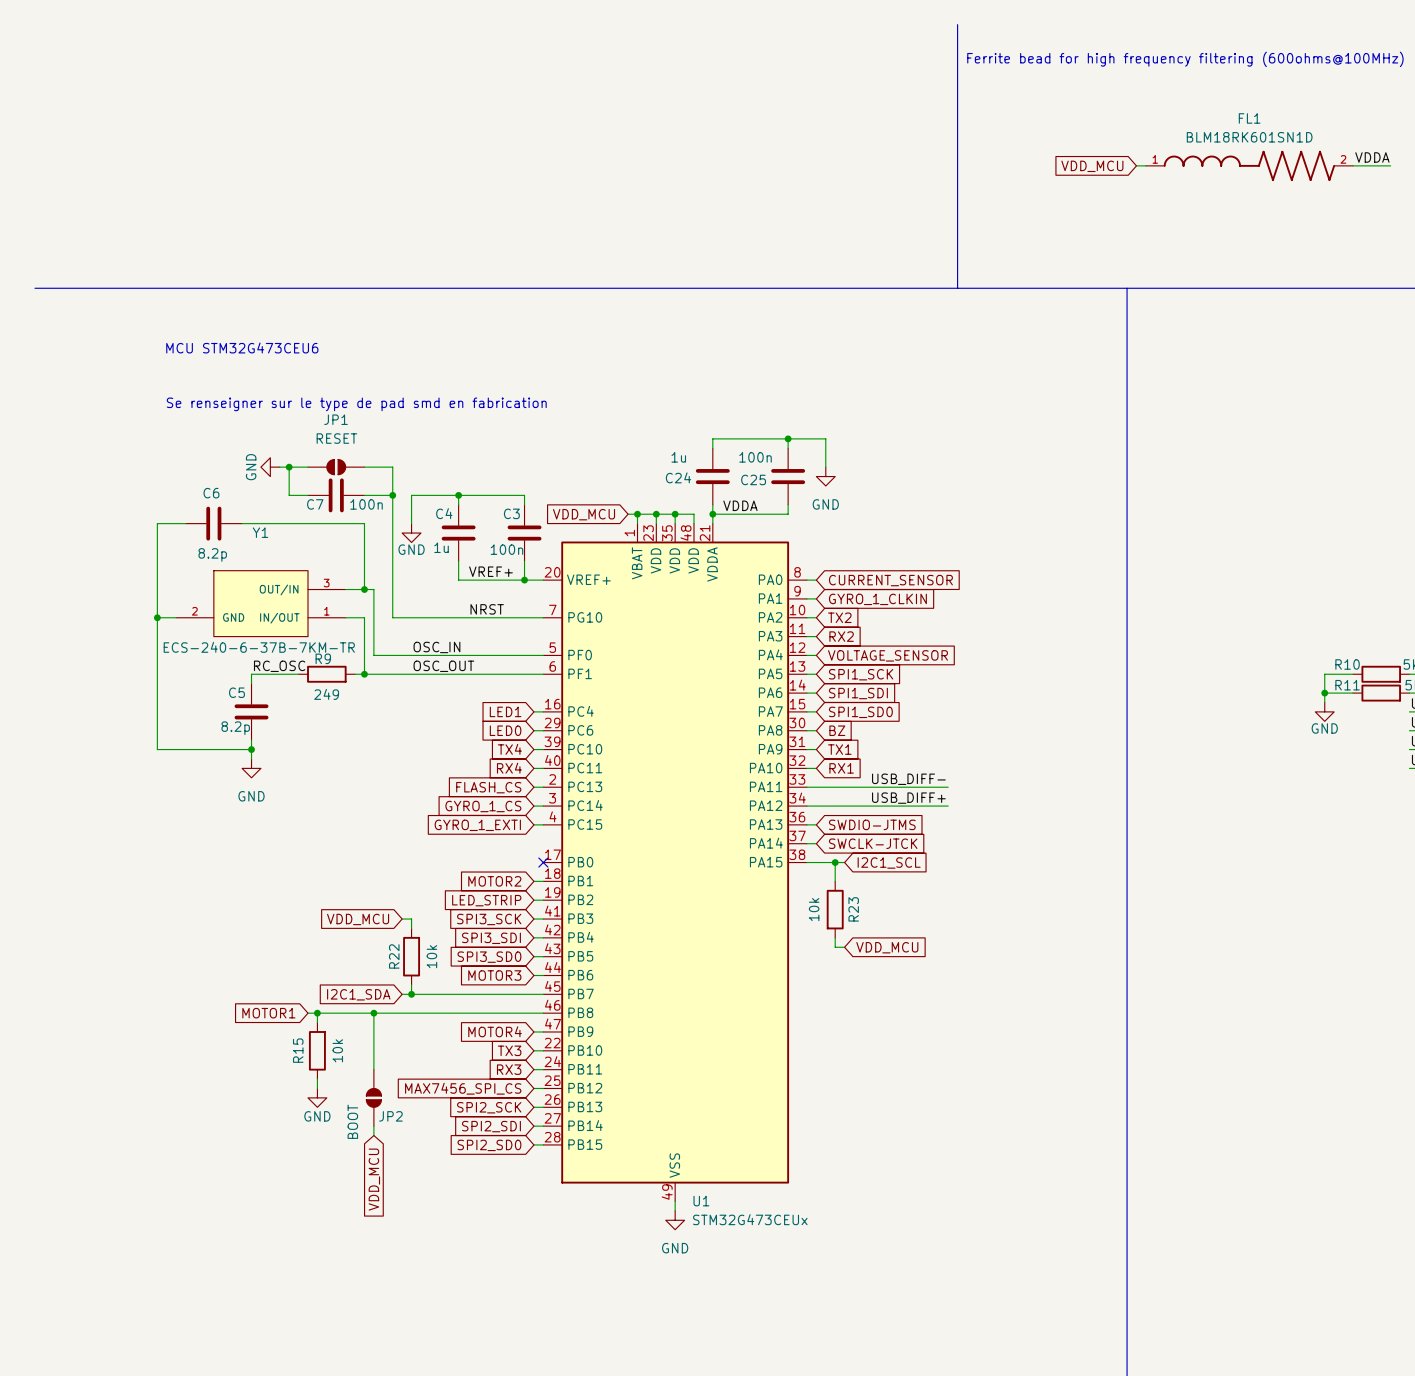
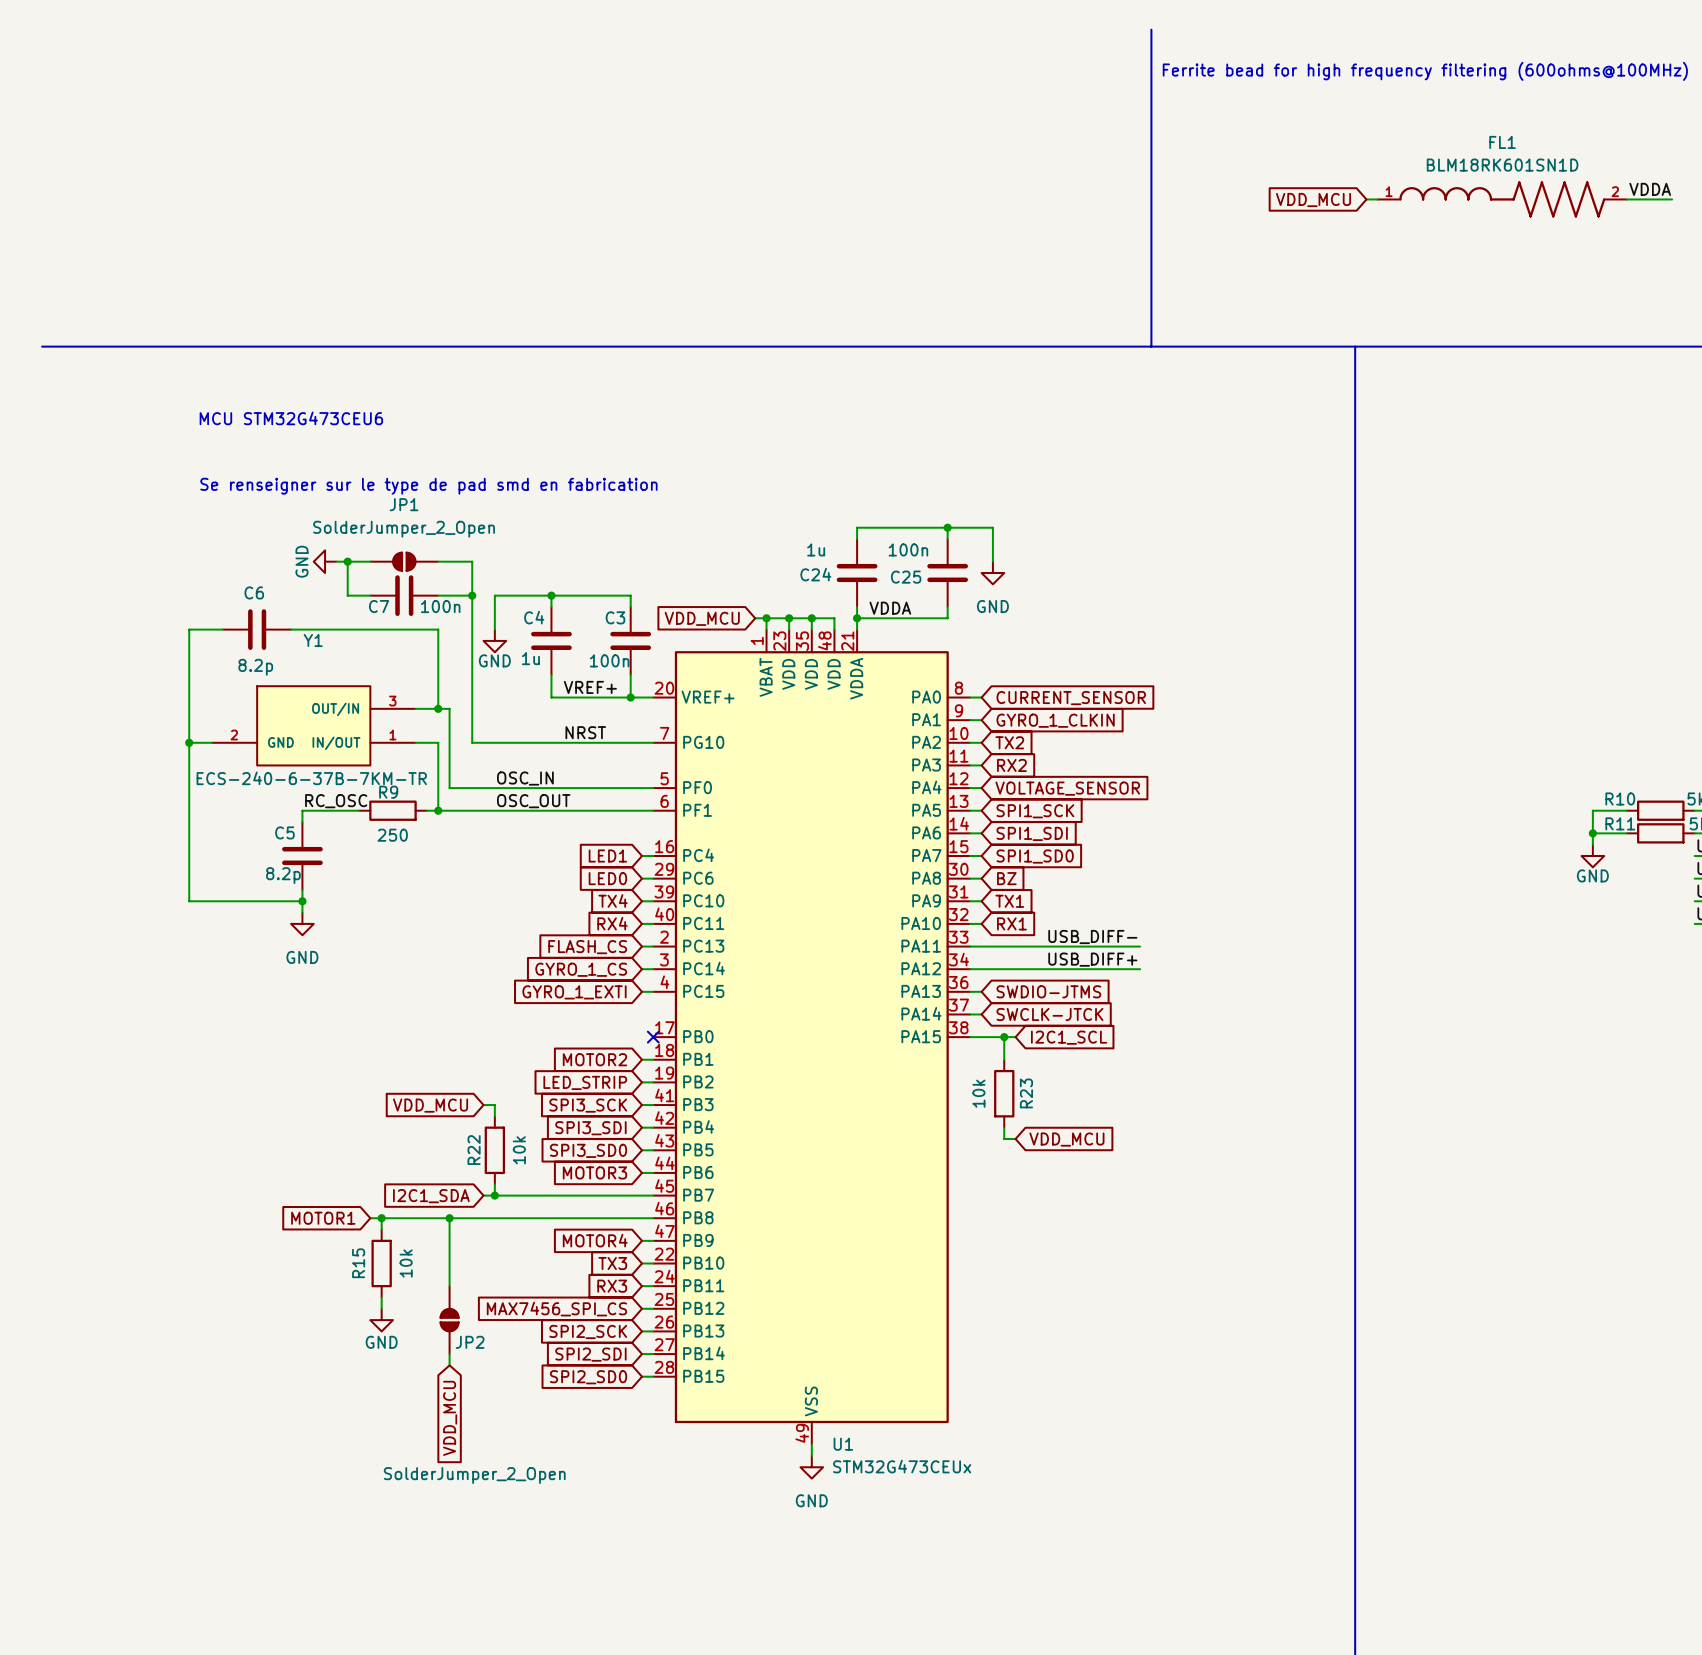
JP1 value: RESET (336, 438) -> SolderJumper_2_Open (404, 529)
R9 value: 249 (326, 694) -> 250 (392, 835)
JP2 value: BOOT (352, 1121) -> SolderJumper_2_Open (474, 1475)

